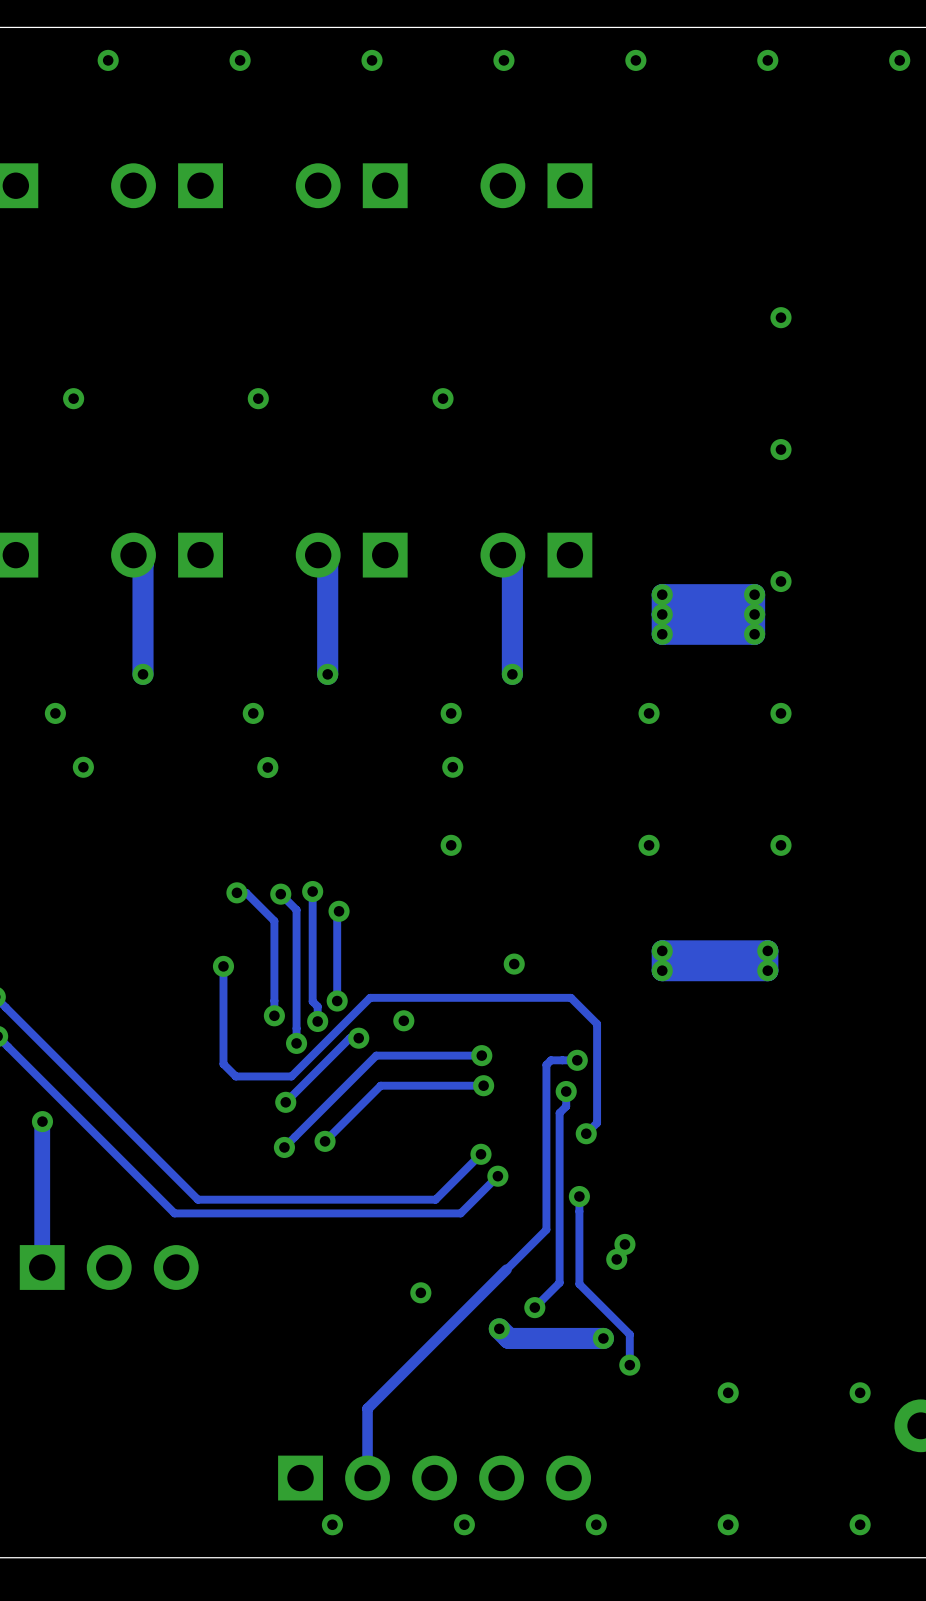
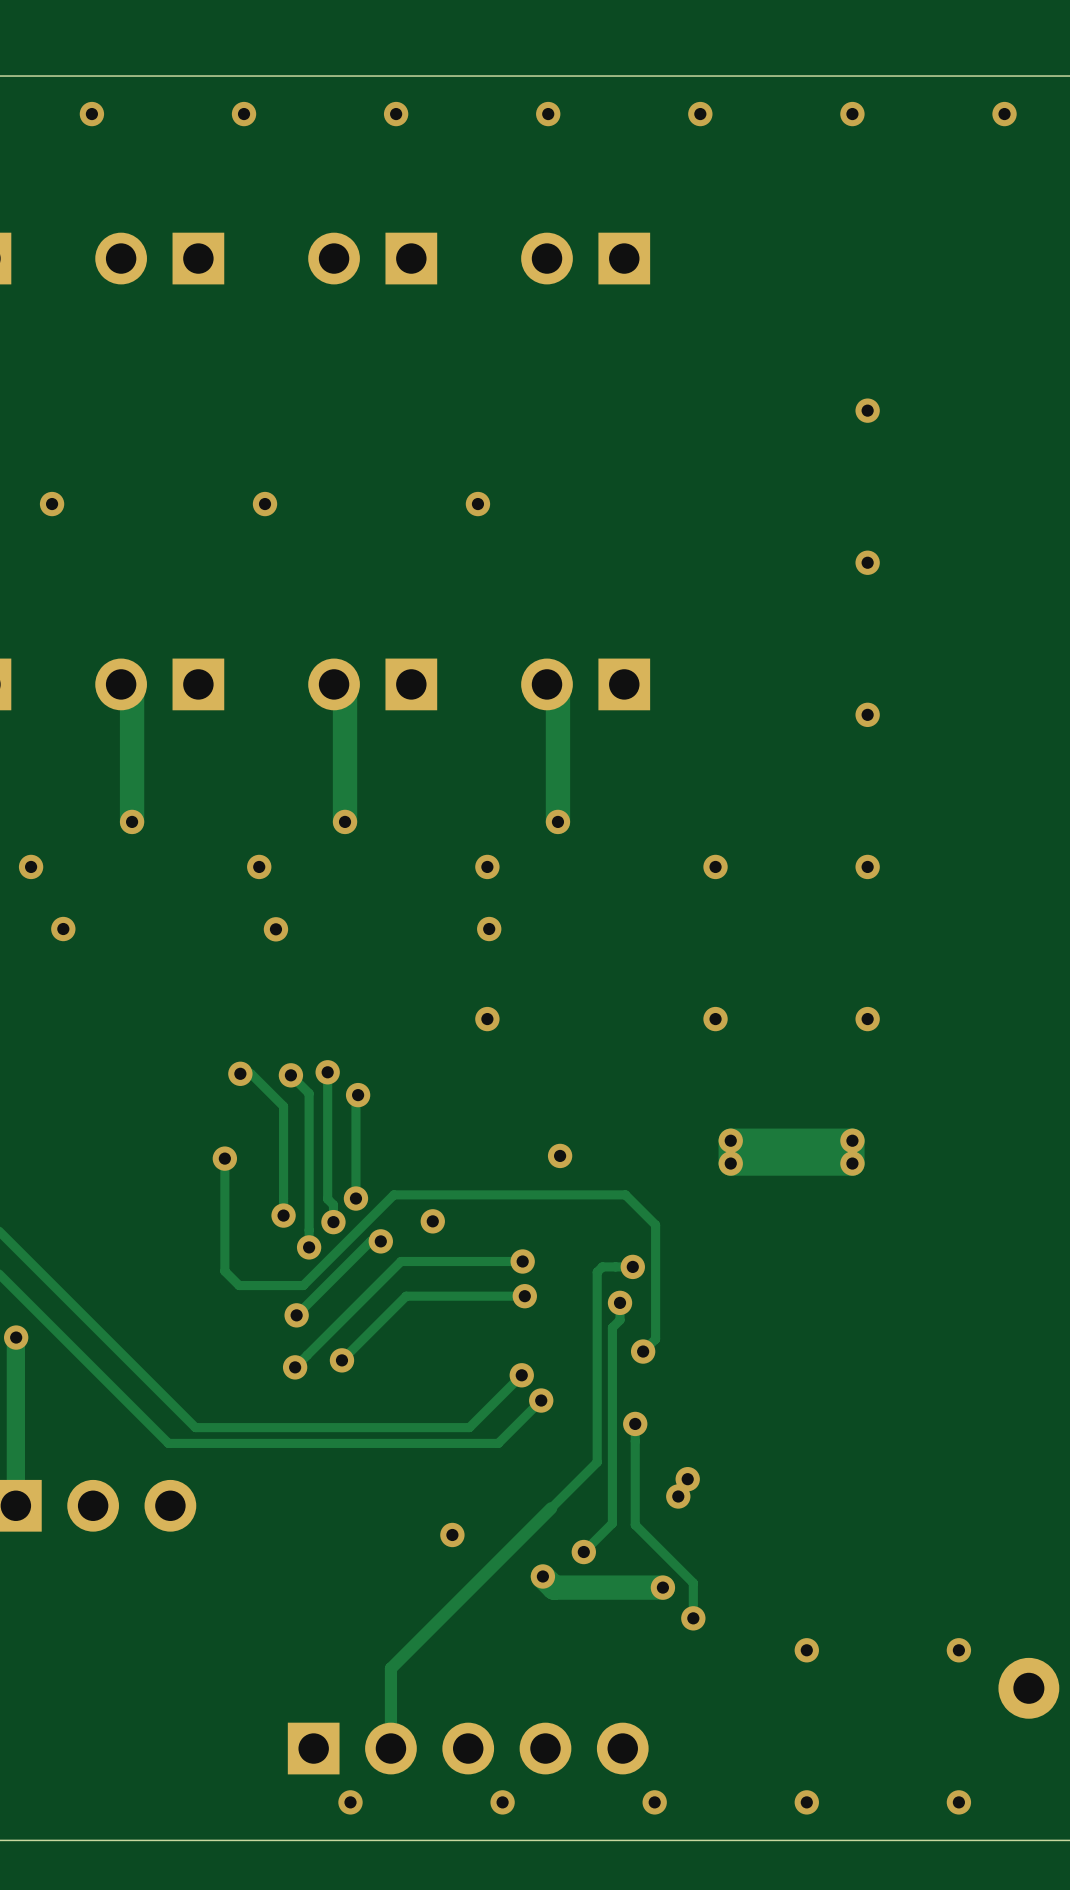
via: (662, 594) -> none
track: (754, 594) (754, 634) (662, 634) (662, 594) (754, 594) -> none
via: (754, 594) -> none
via: (662, 614) -> none
track: (754, 614) (662, 614) -> none
via: (754, 614) -> none
via: (662, 634) -> none
via: (754, 634) -> none

